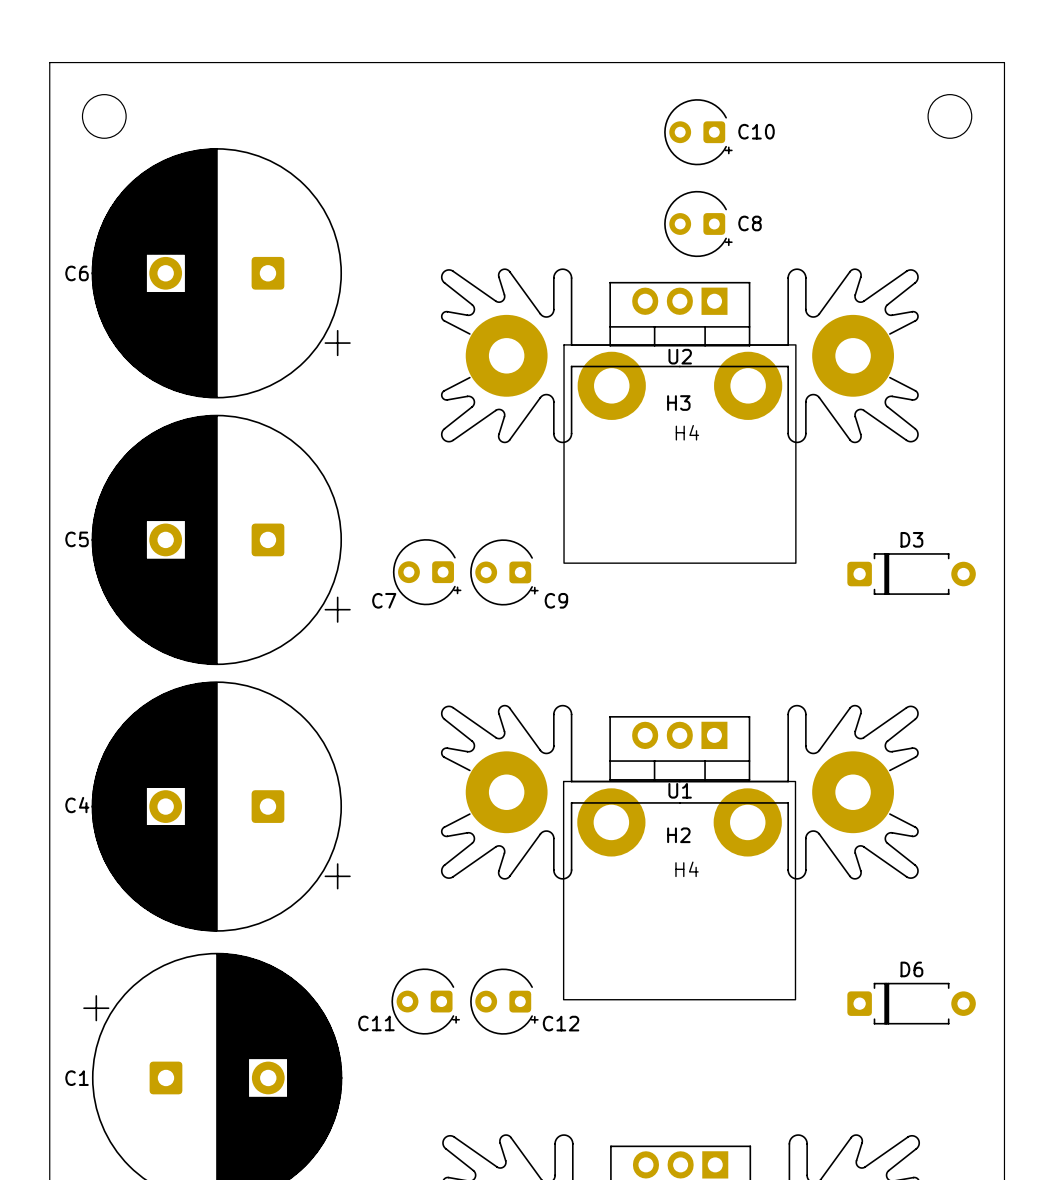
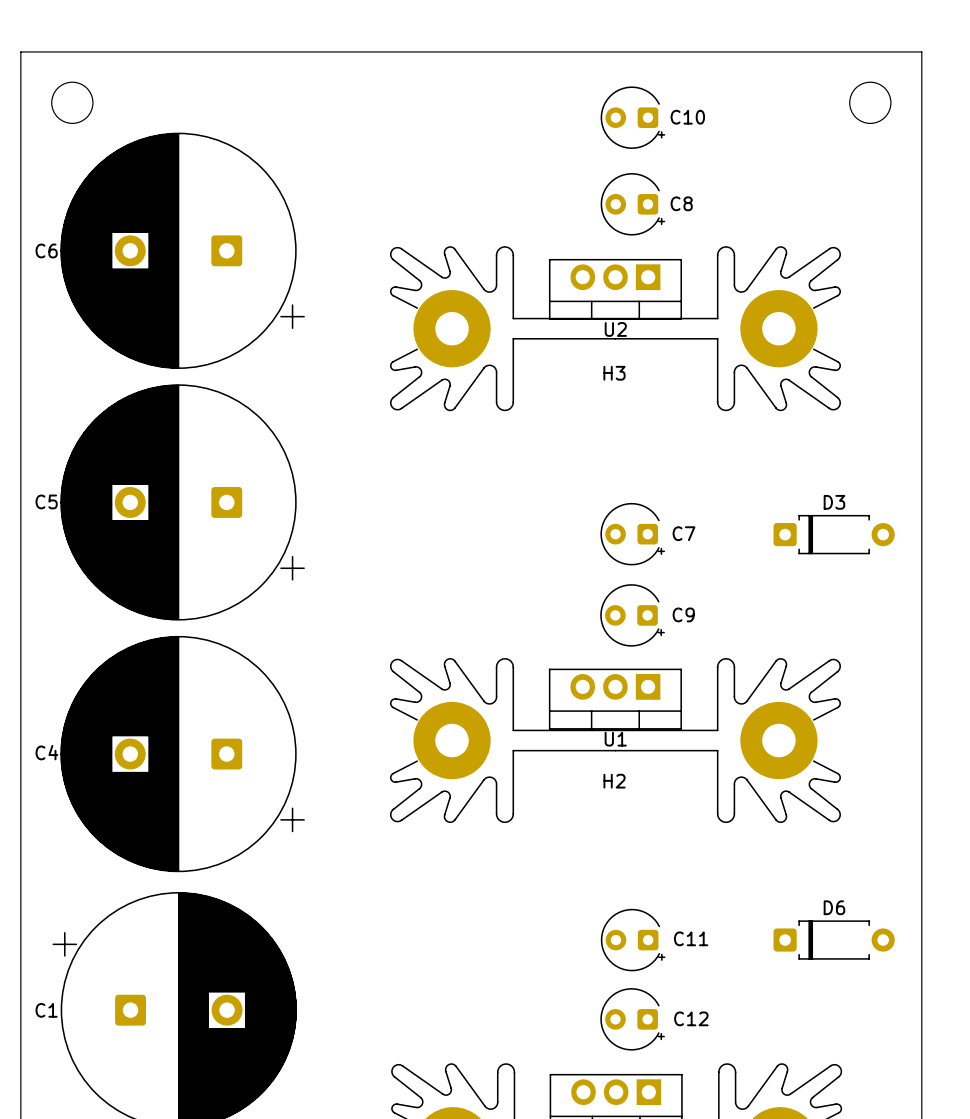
H4: (679, 454) -> none
C7 position: (427, 572) -> (632, 534)
C9 position: (504, 572) -> (632, 615)
C7 name position: C7 (384, 600) -> C7 (684, 533)
C9 name position: C9 (556, 600) -> C9 (683, 614)
H4: (679, 890) -> none
C11 position: (425, 1001) -> (633, 940)
C12 position: (504, 1001) -> (632, 1019)
C11 name position: C11 (376, 1023) -> C11 (691, 938)
C12 name position: C12 (561, 1023) -> C12 (691, 1018)

